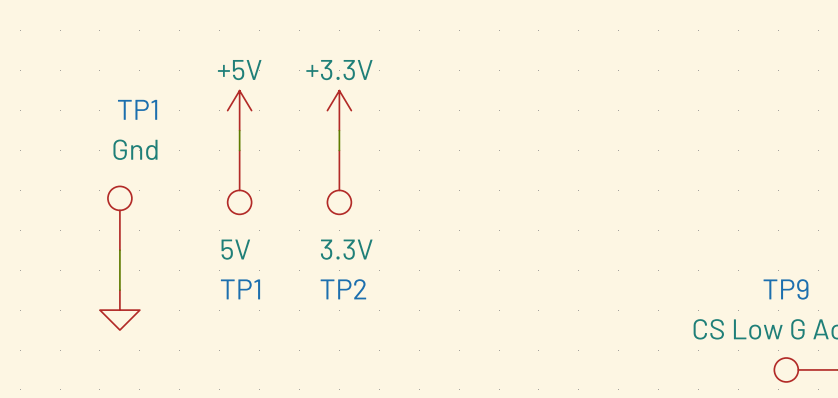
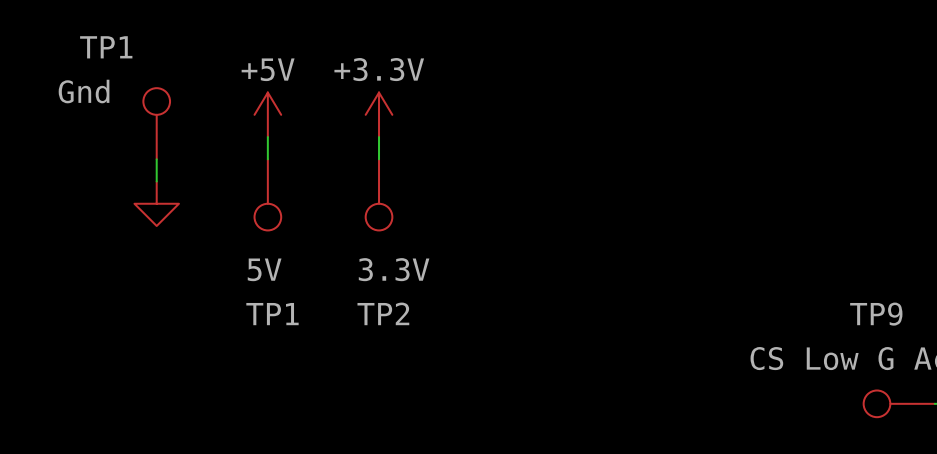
TP1 name position: TP1 (137, 109) -> TP1 (106, 47)
TP1 value position: Gnd (135, 149) -> Gnd (84, 91)
wire: none -> (156, 159) (156, 181)
TP1 position: (119, 218) -> (156, 123)
wire: (119, 250) (119, 290) -> none
power symbol position: (119, 310) -> (156, 203)

